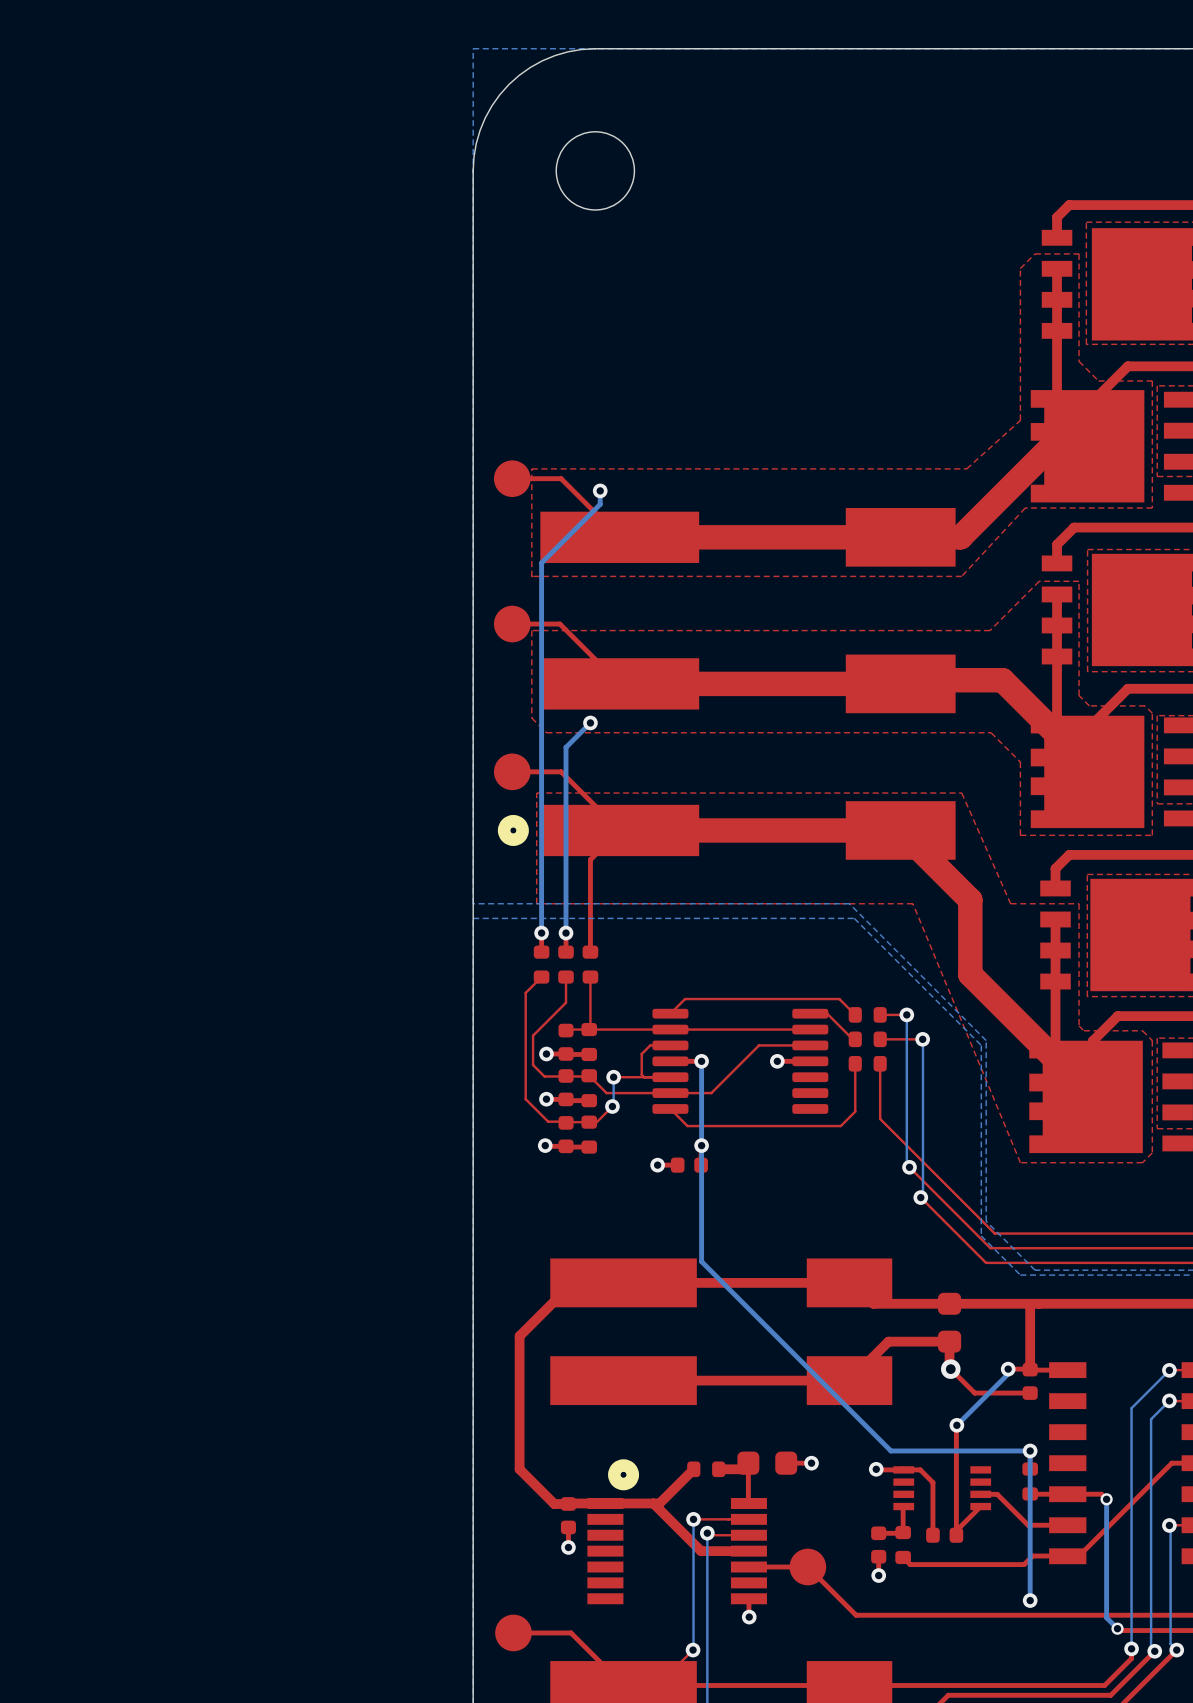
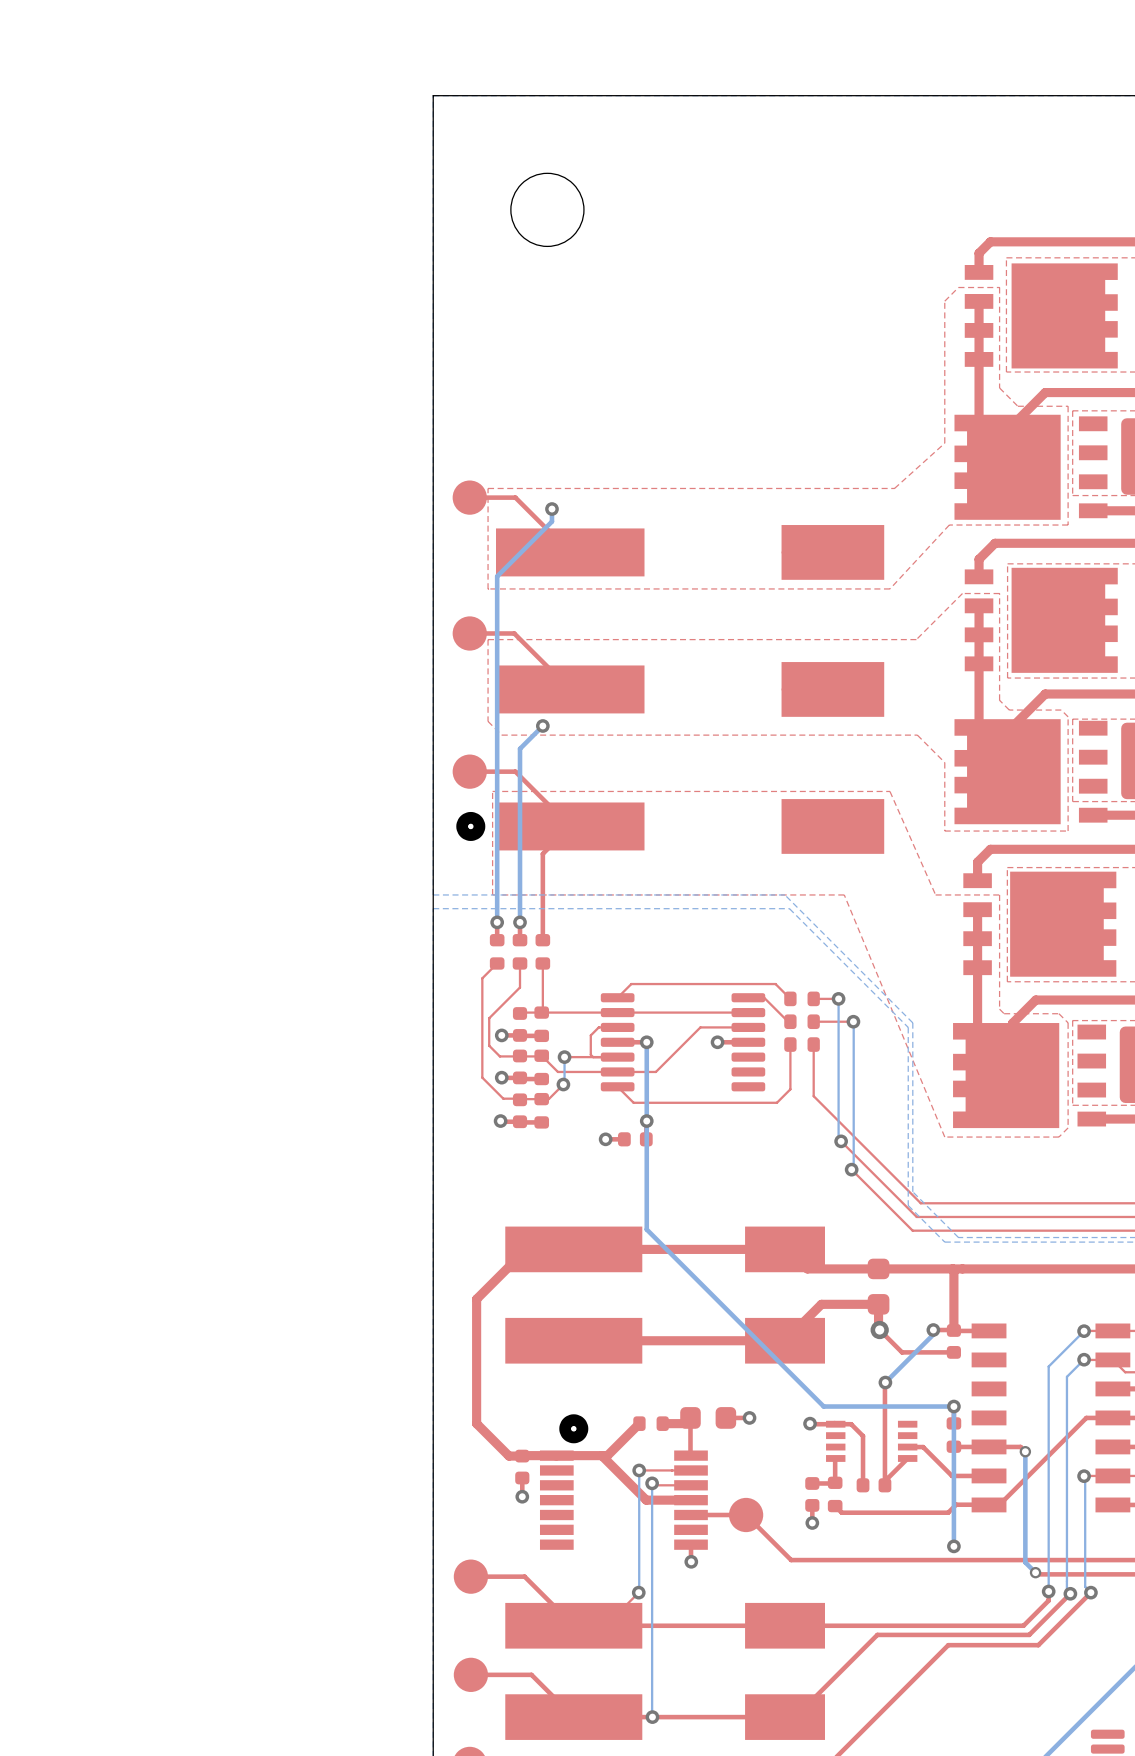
board edge: (595, 48) (581, 49) (554, 55) (530, 67) (508, 84) (499, 94) (485, 117) (476, 143) (473, 170) -> (547, 95) (433, 95) (433, 209)
top track: (1094, 446) (1051, 446) (960, 537) (619, 537) -> none
top track: (619, 683) (900, 683) (904, 680) (1002, 680) (1094, 771) -> none
top track: (619, 830) (900, 830) (970, 900) (970, 974) (1092, 1096) -> none

